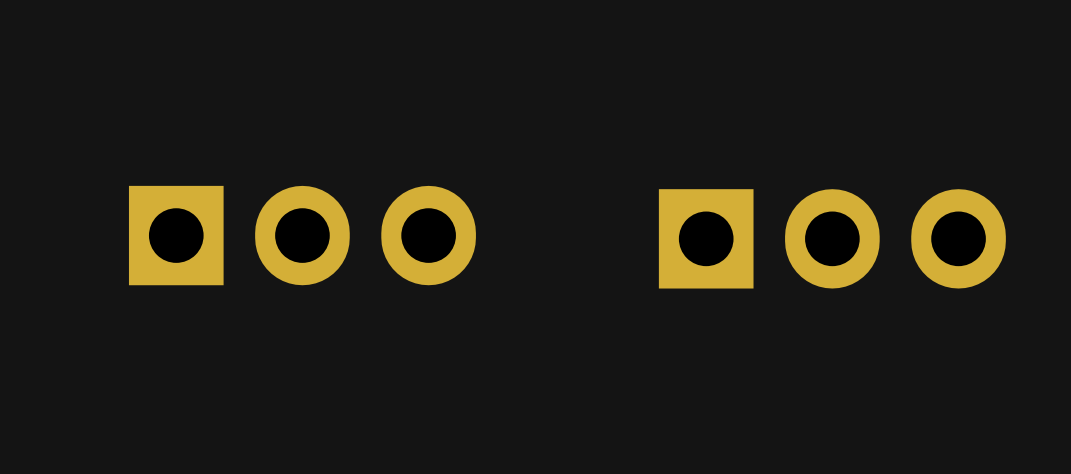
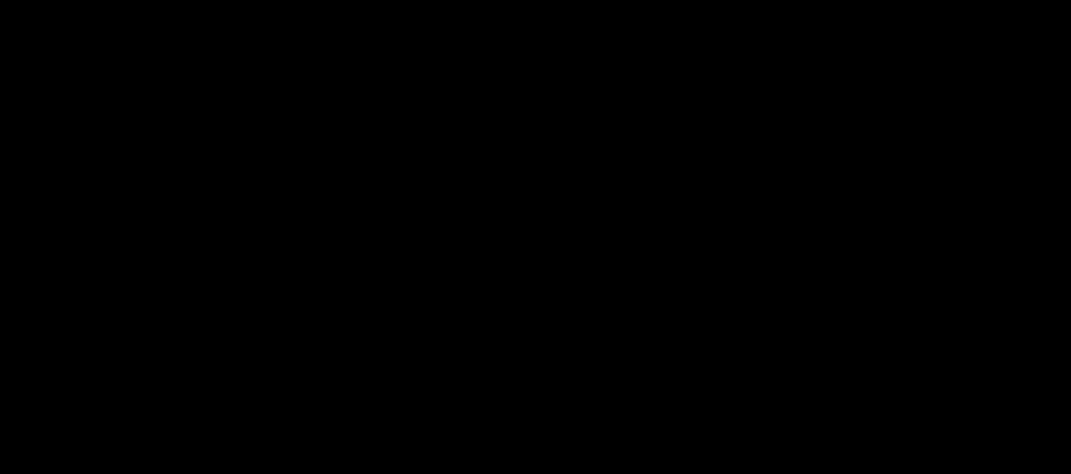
part: (302, 235) -> none
part: (832, 238) -> none

